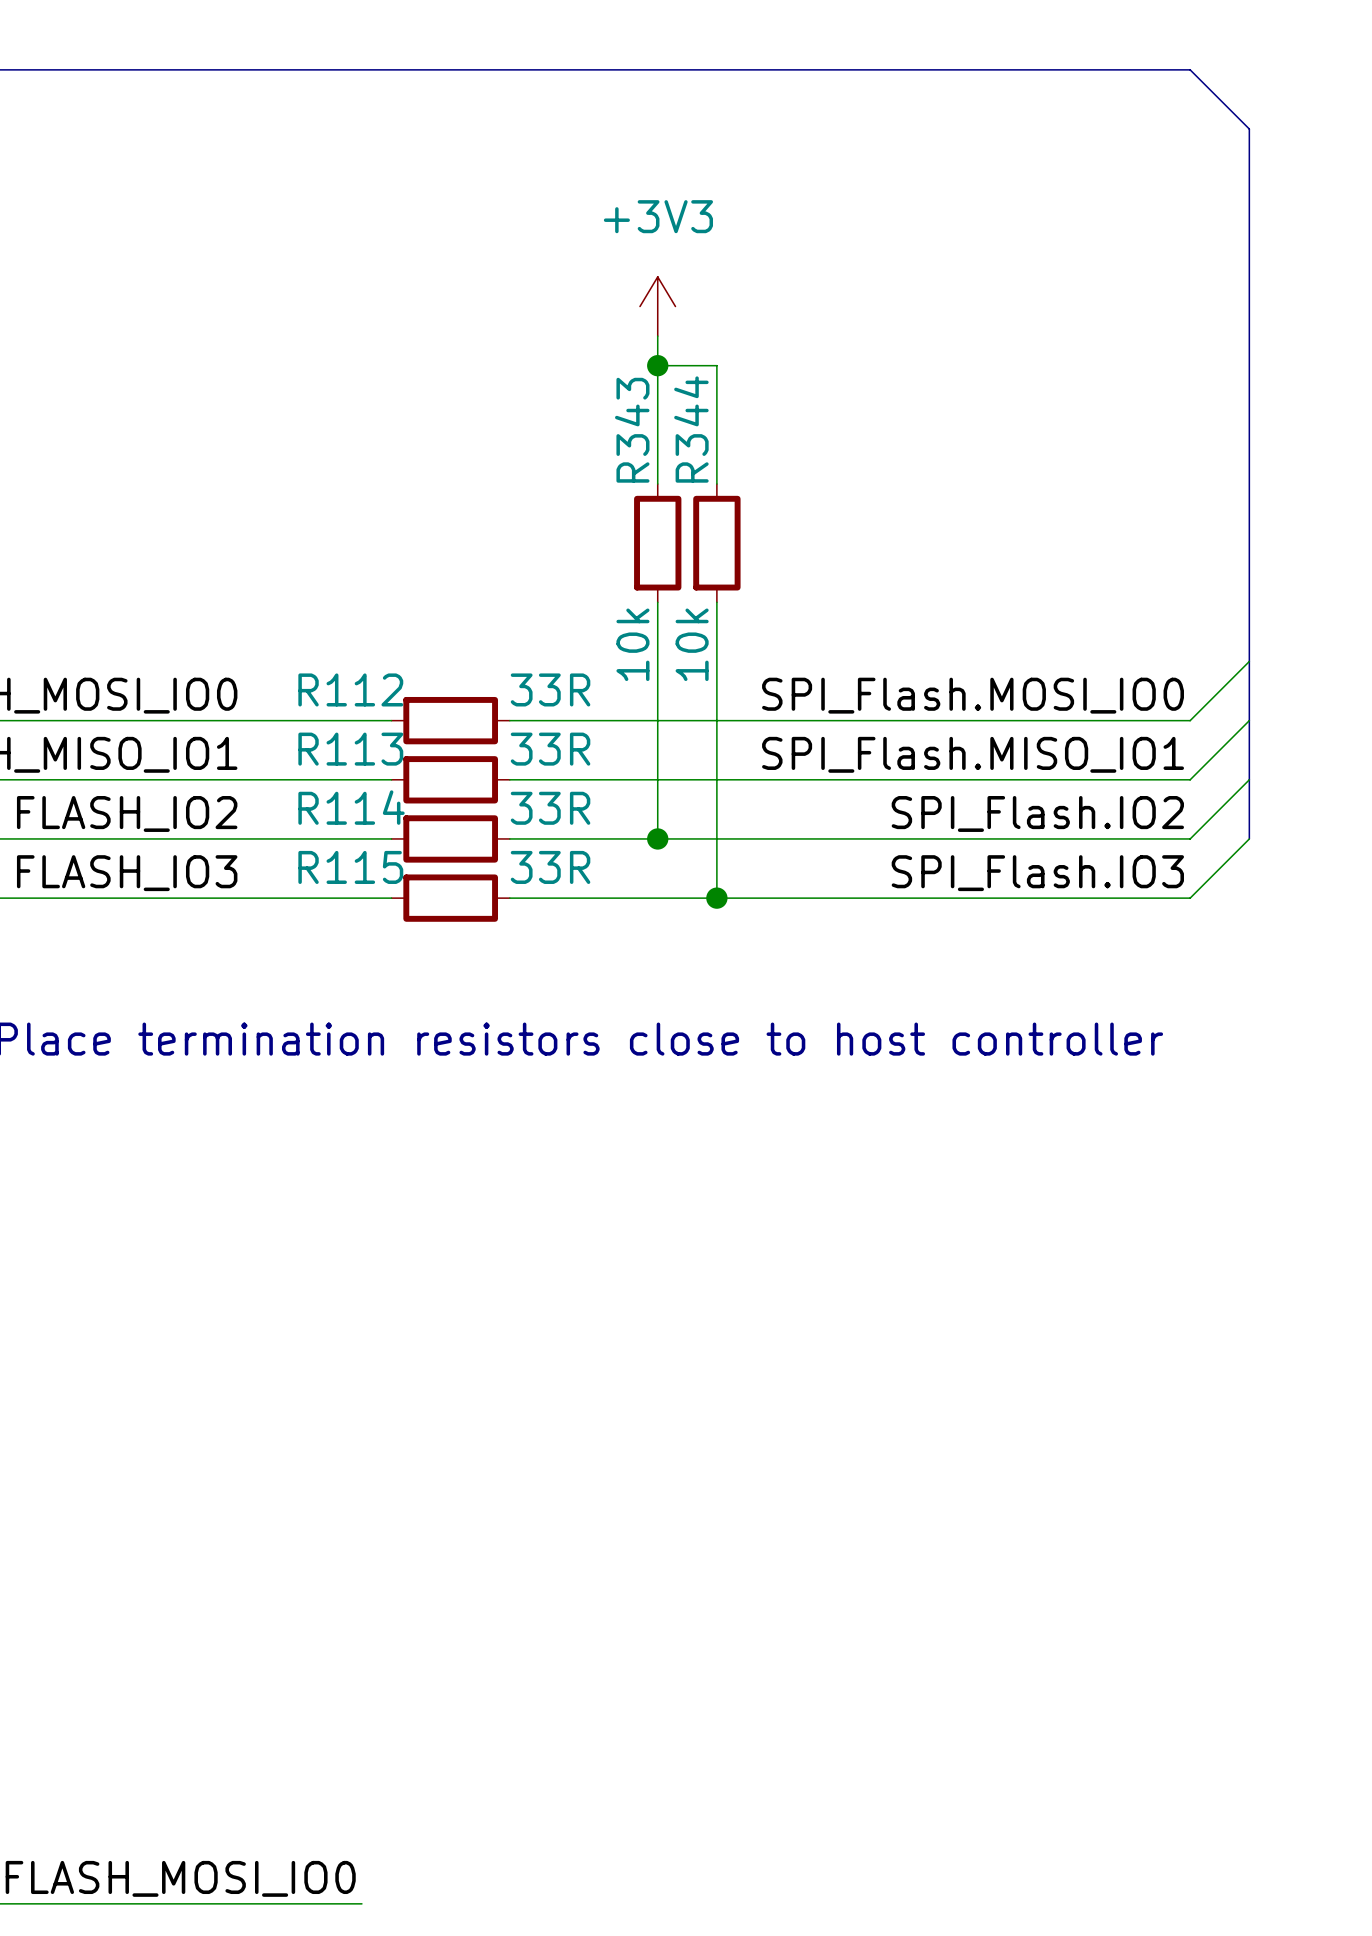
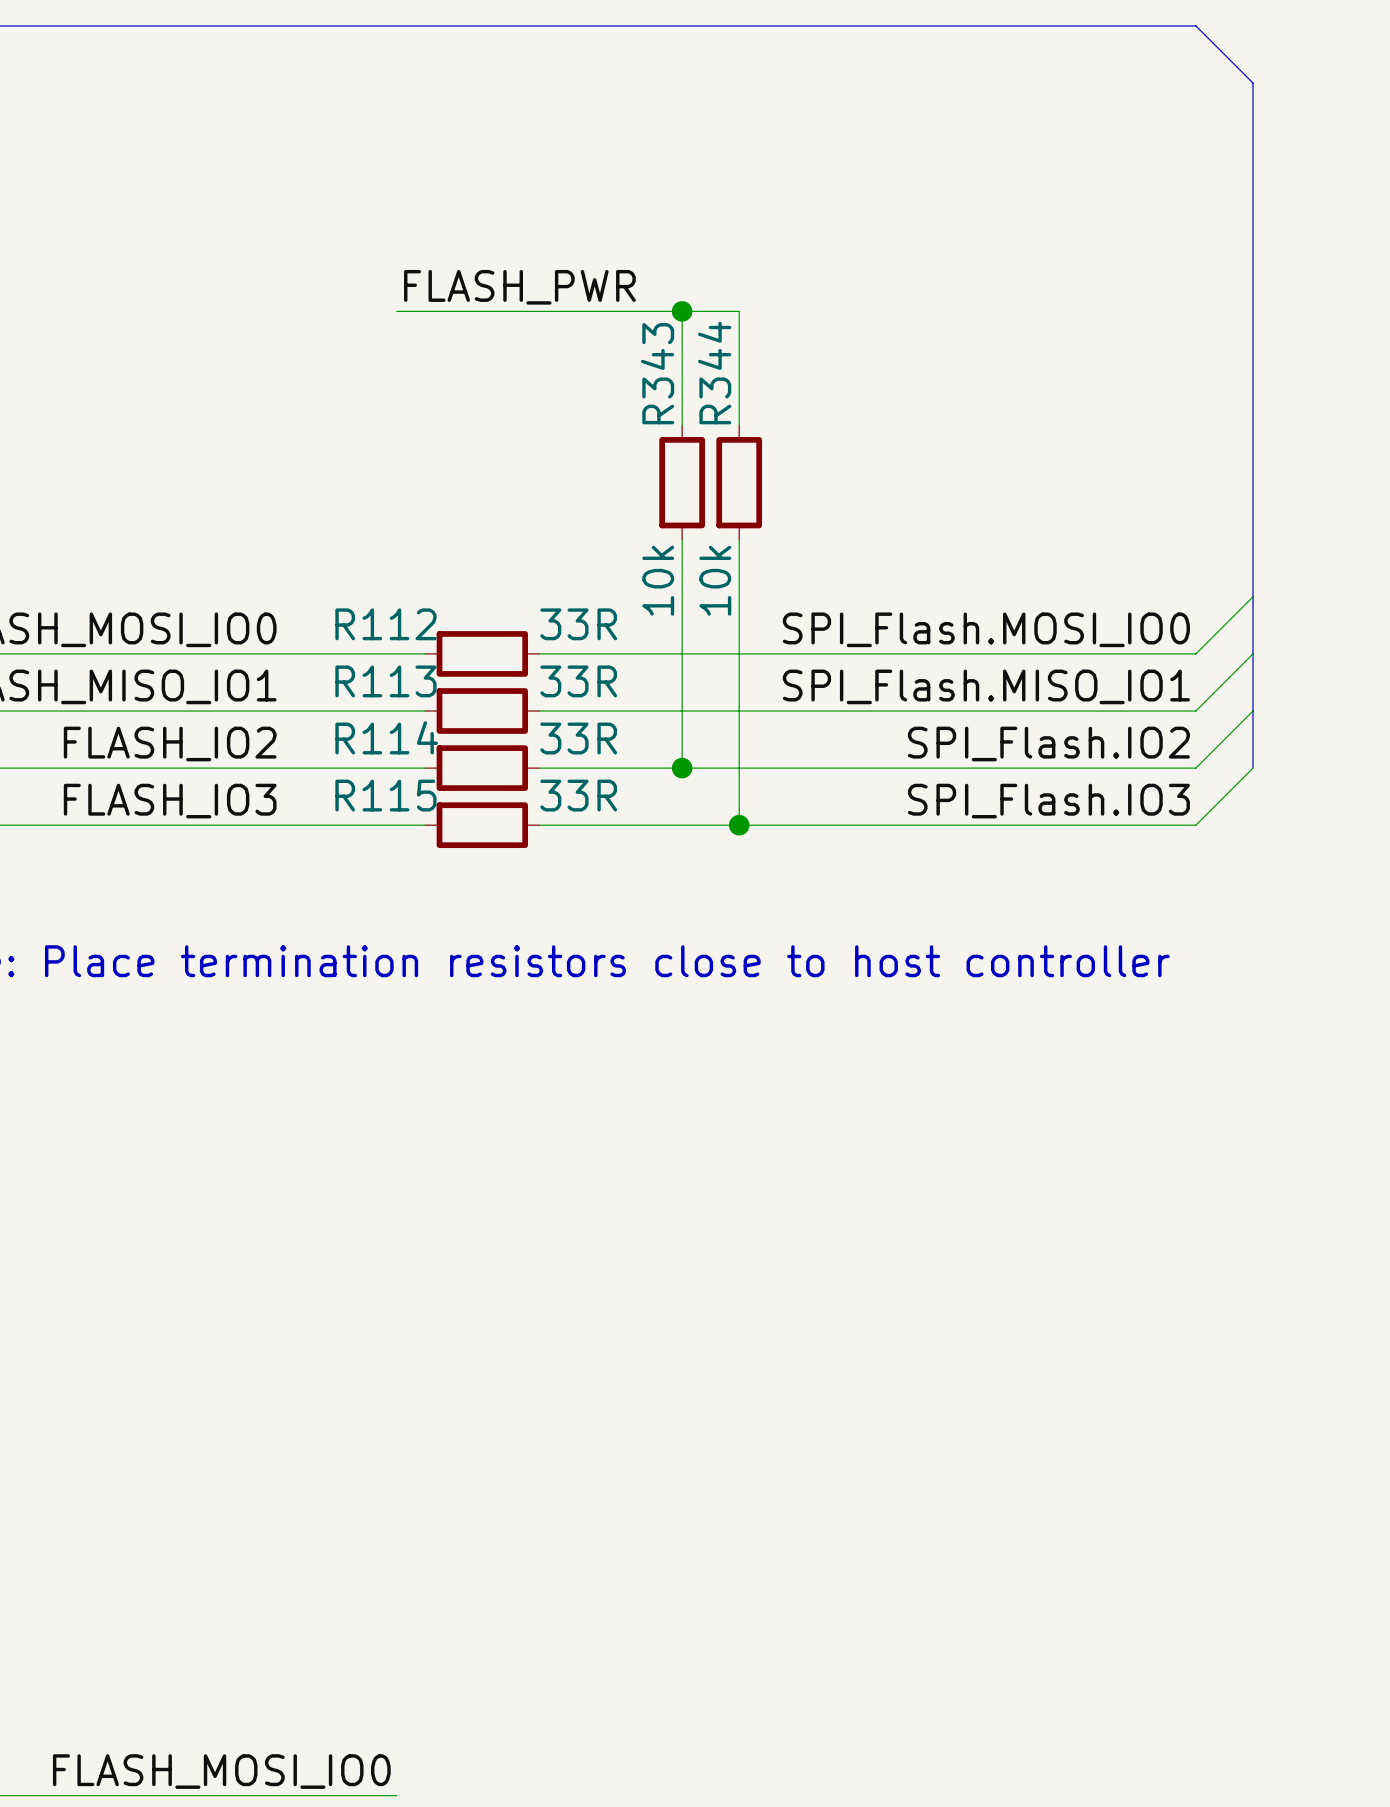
power symbol: +3V3 (657, 306) -> none
wire: (657, 336) (657, 365) -> (396, 311) (682, 311)
label: none -> FLASH_PWR (519, 287)

